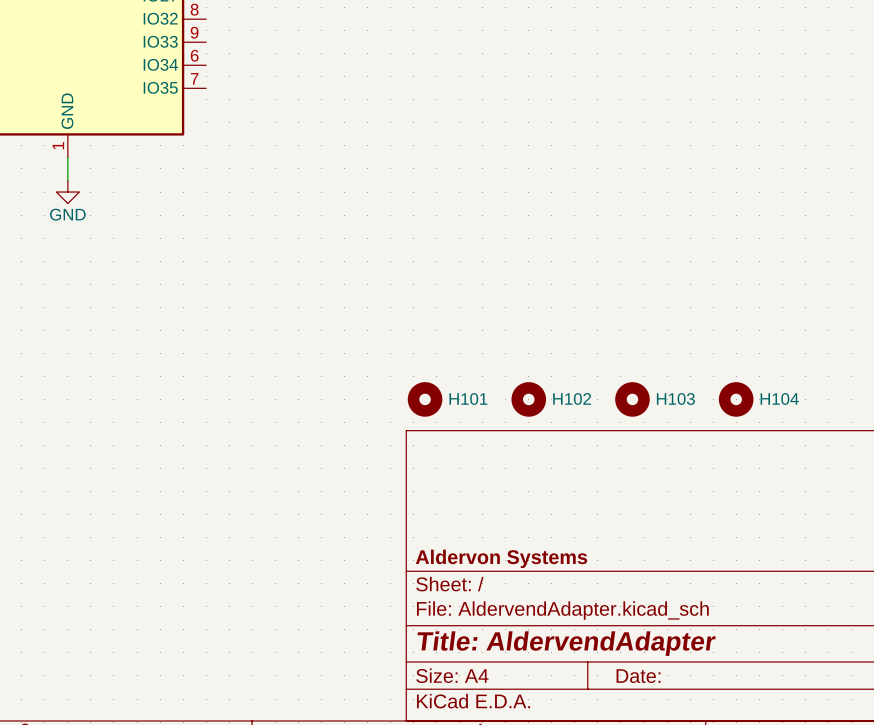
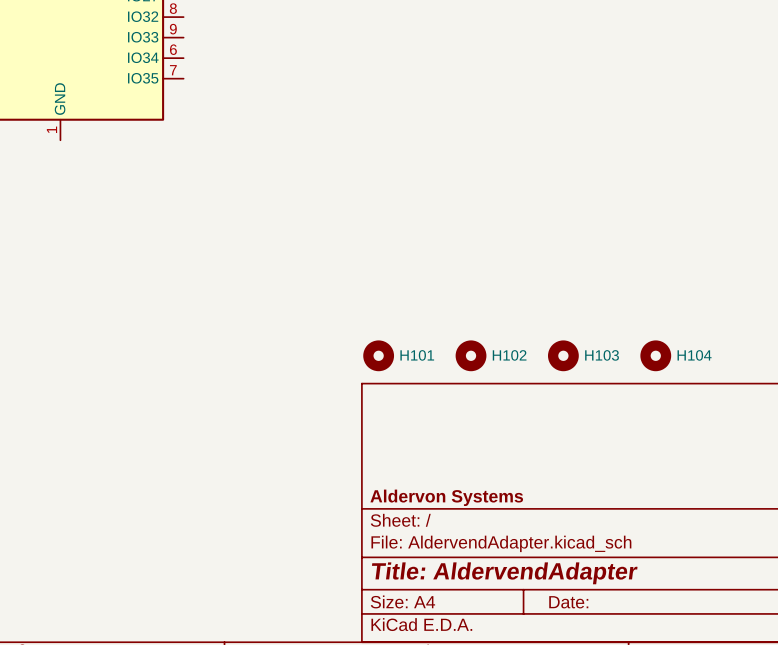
wire: (67, 157) (67, 180) -> none
power symbol: GND (67, 192) -> none

